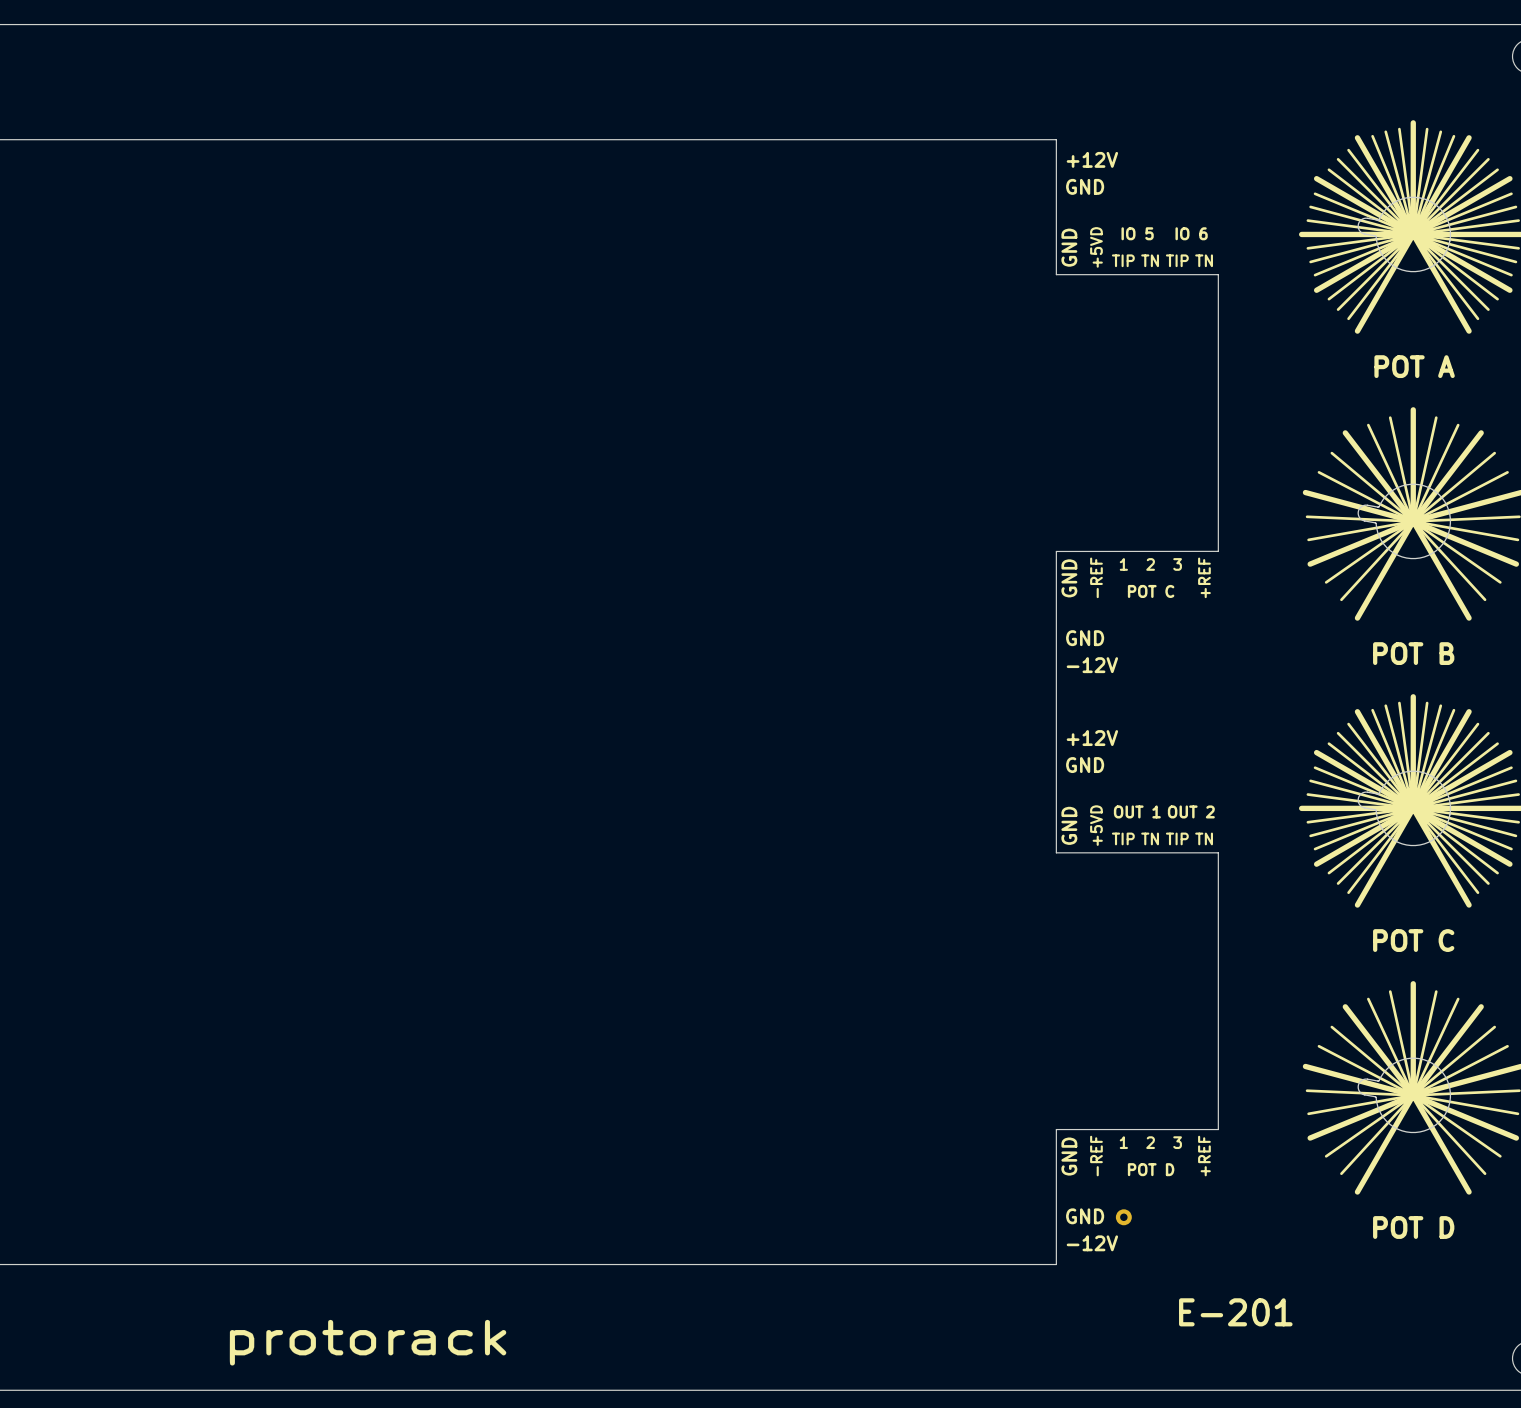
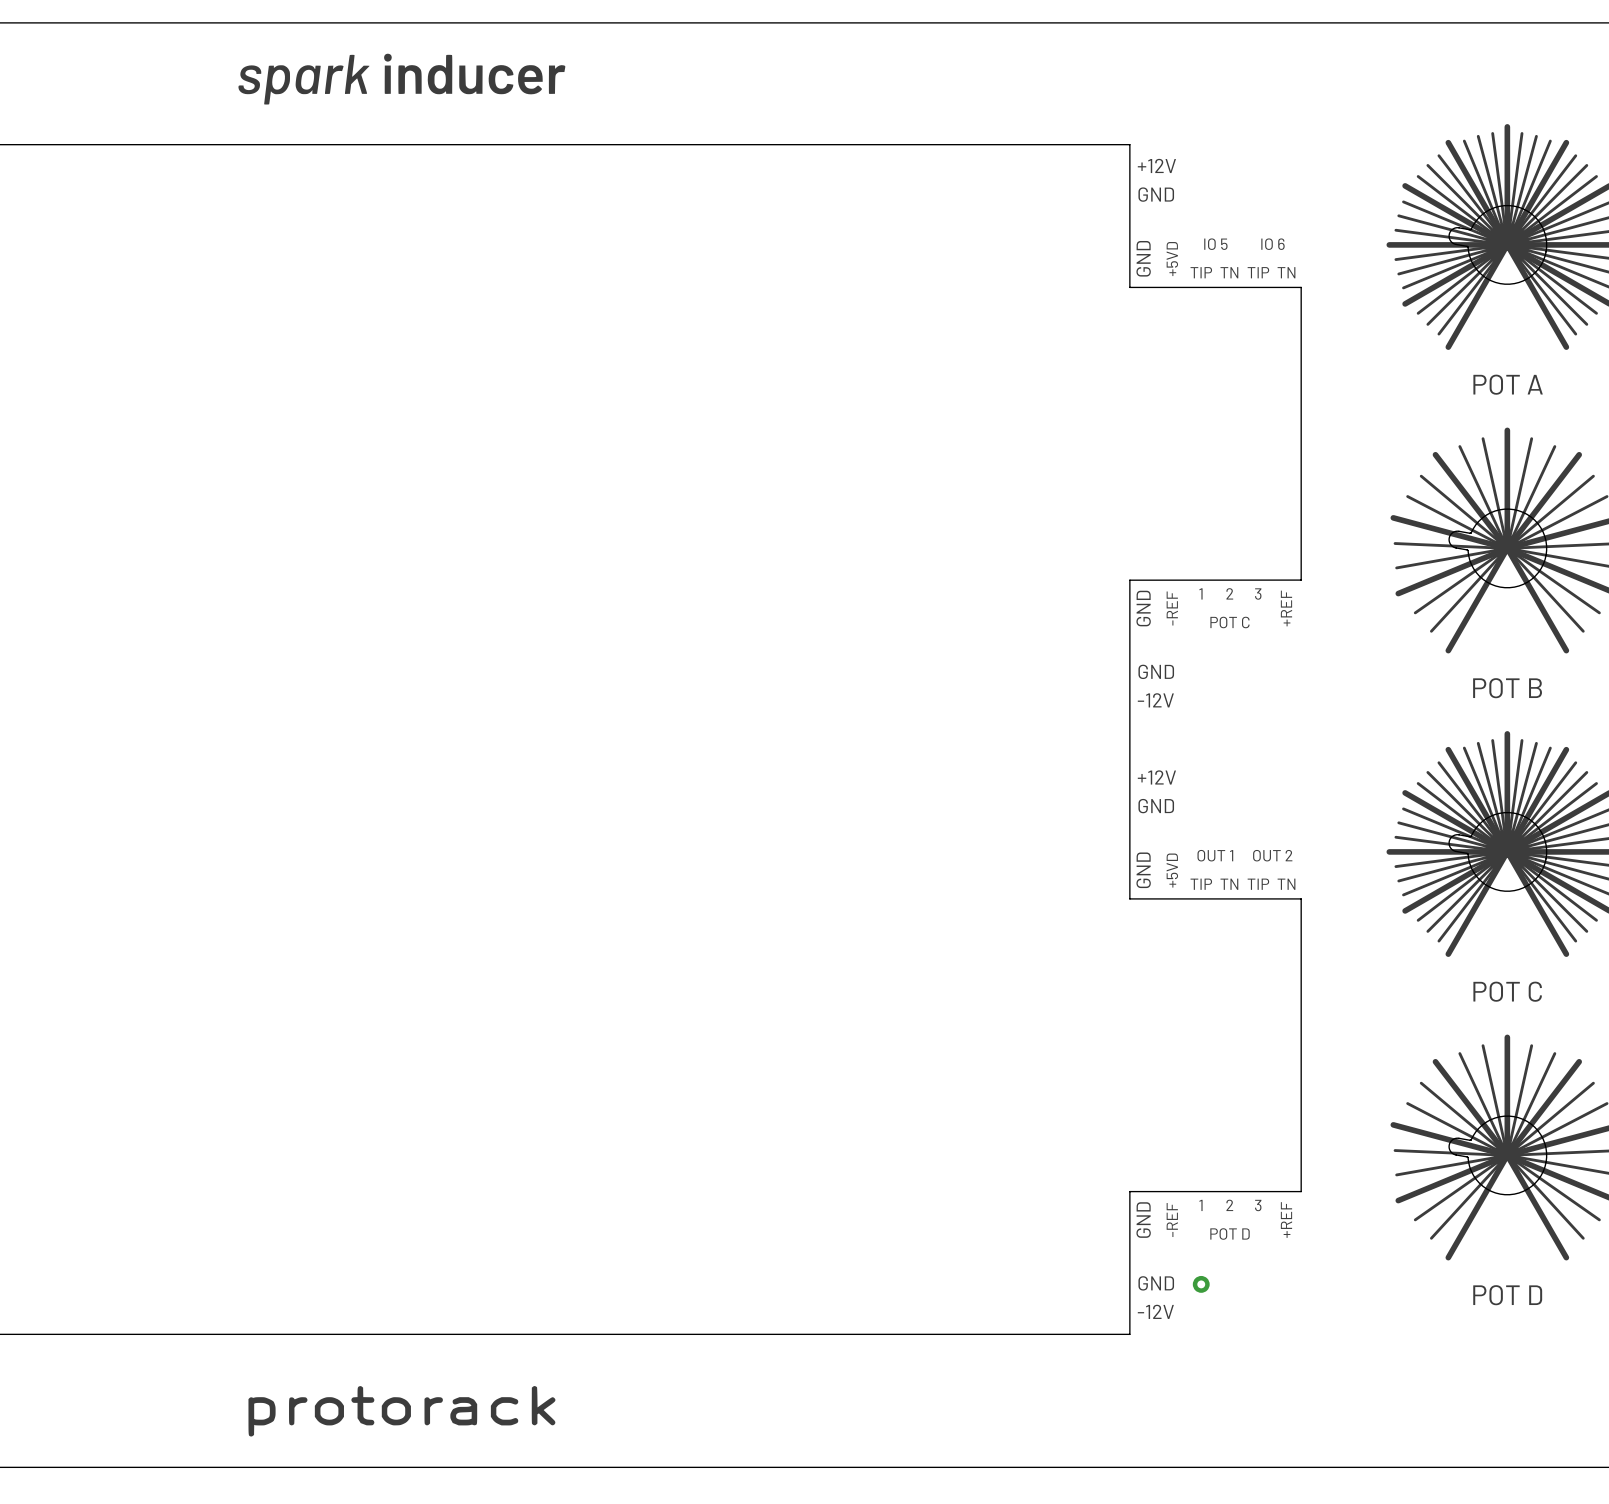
drawing: none -> [238, 53, 566, 105]
text: E-201 (1235, 1312) -> none
drawing shape: [229, 1319, 507, 1366] -> [248, 1386, 556, 1437]

